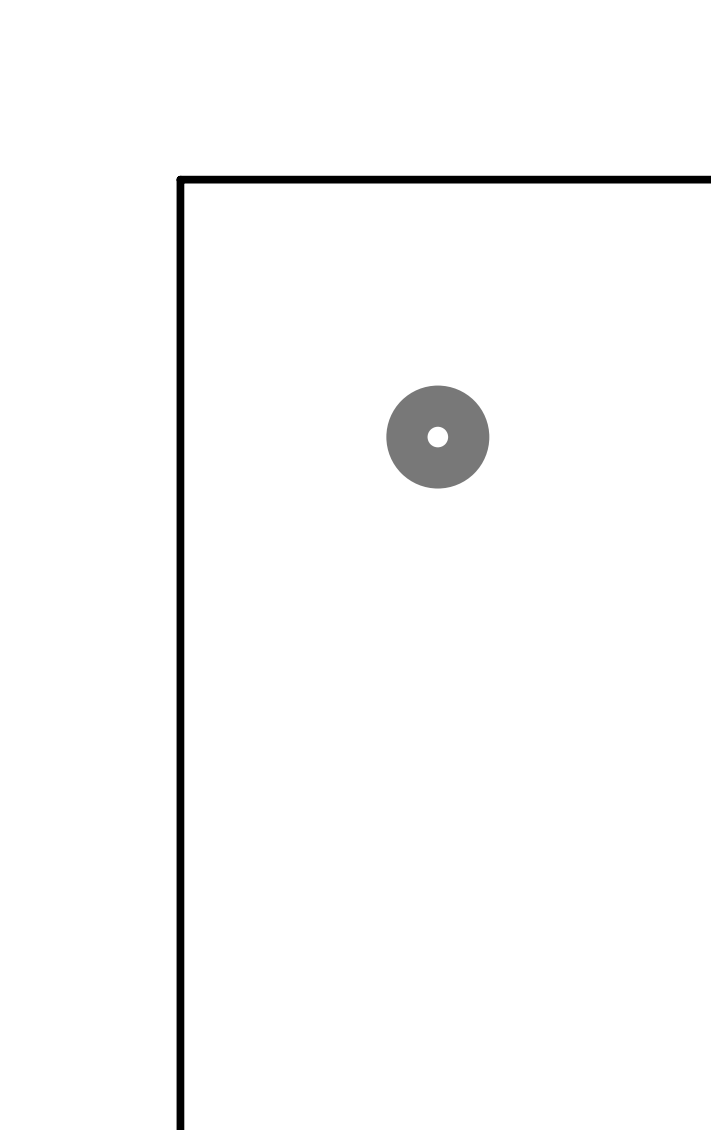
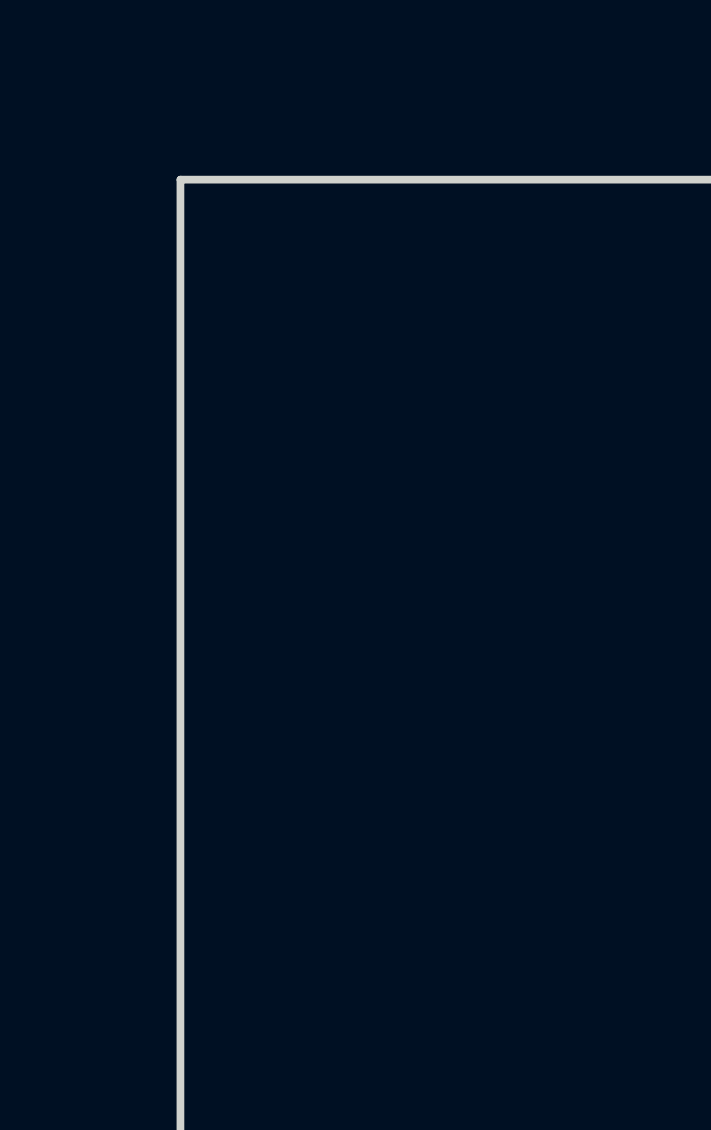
via: (437, 437) -> none

